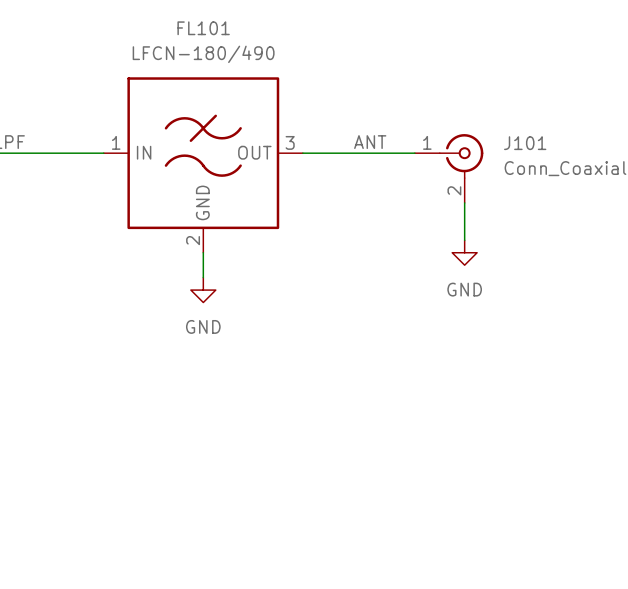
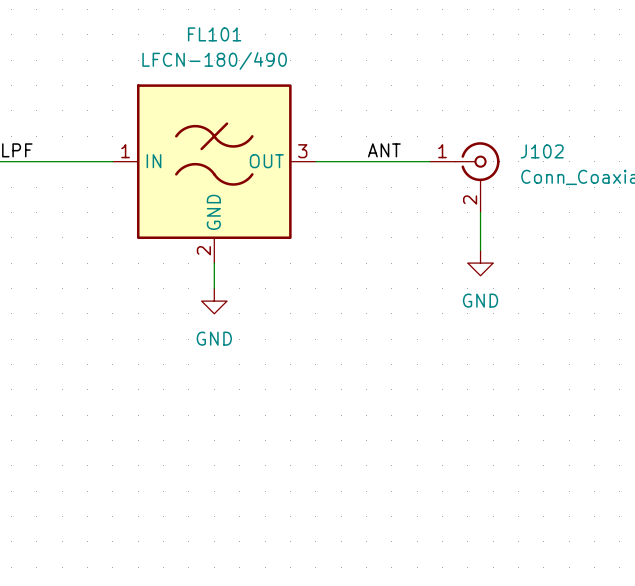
J101 name: J101 (525, 143) -> J102 (542, 151)

